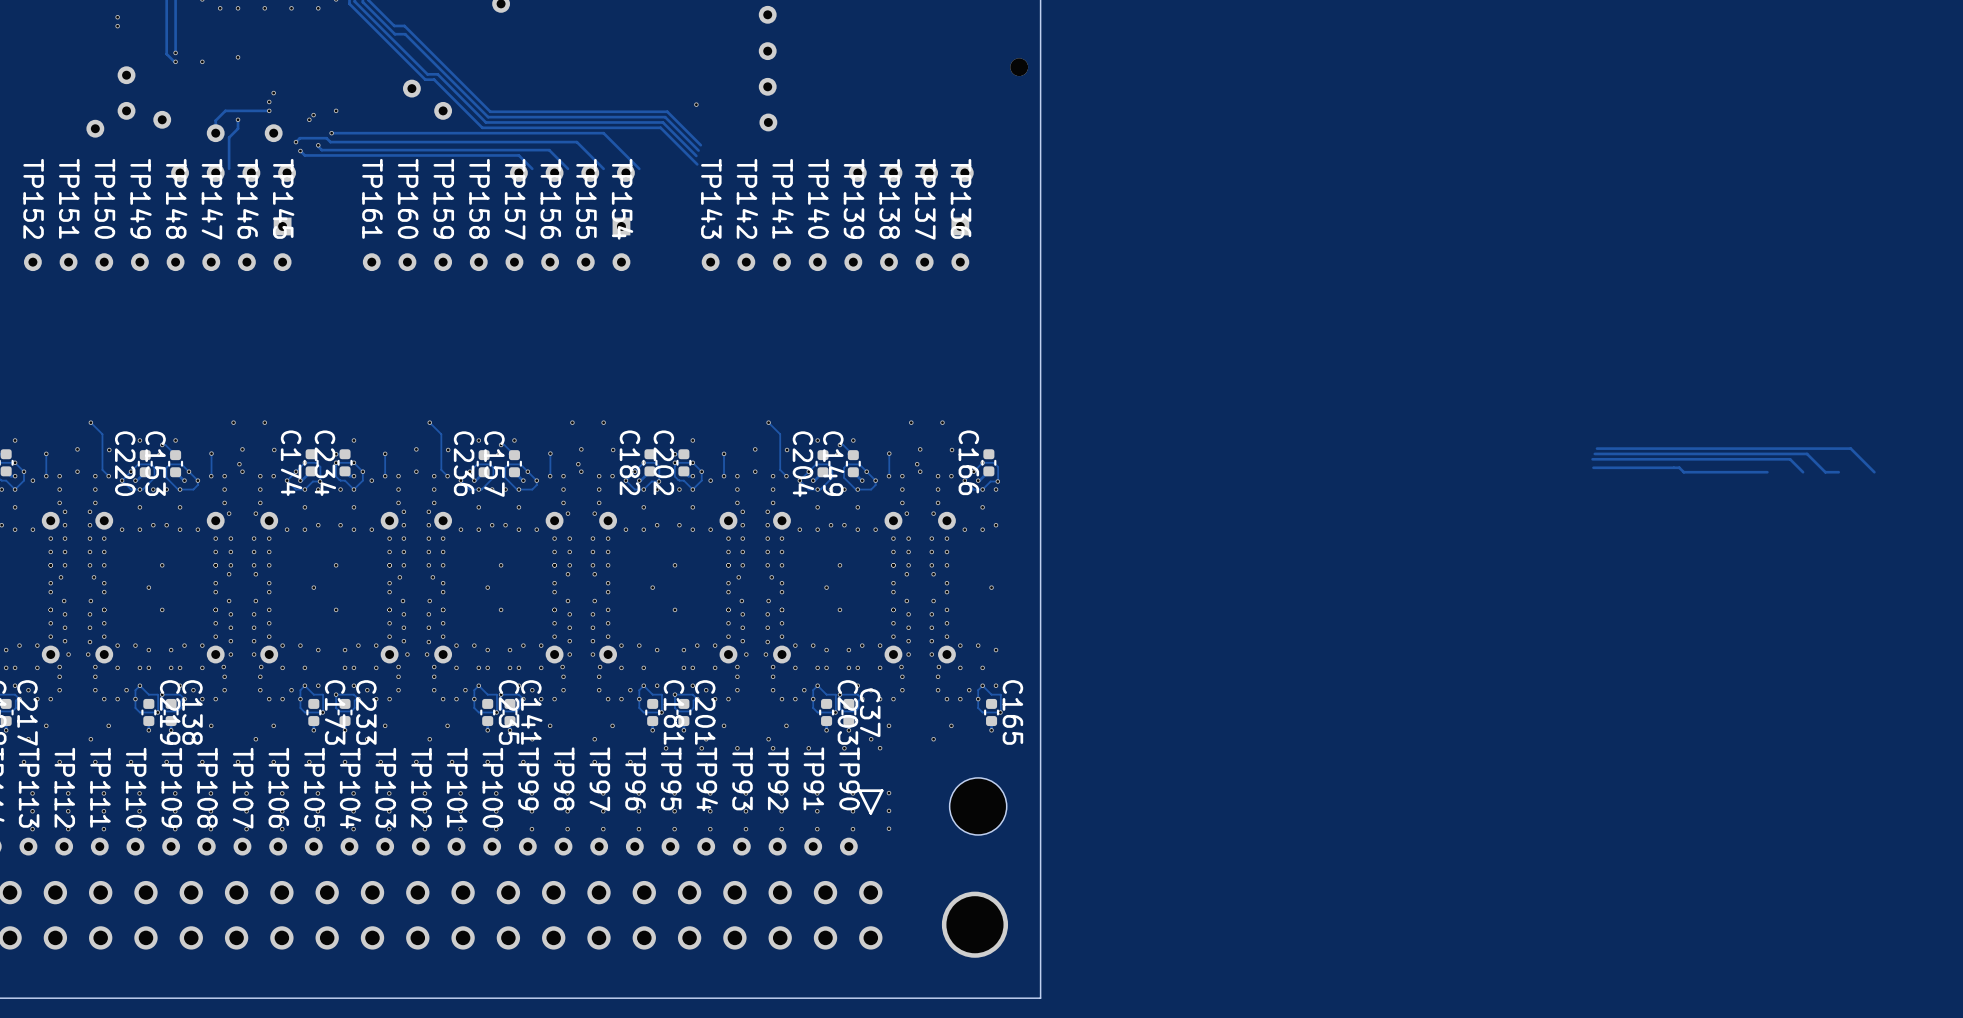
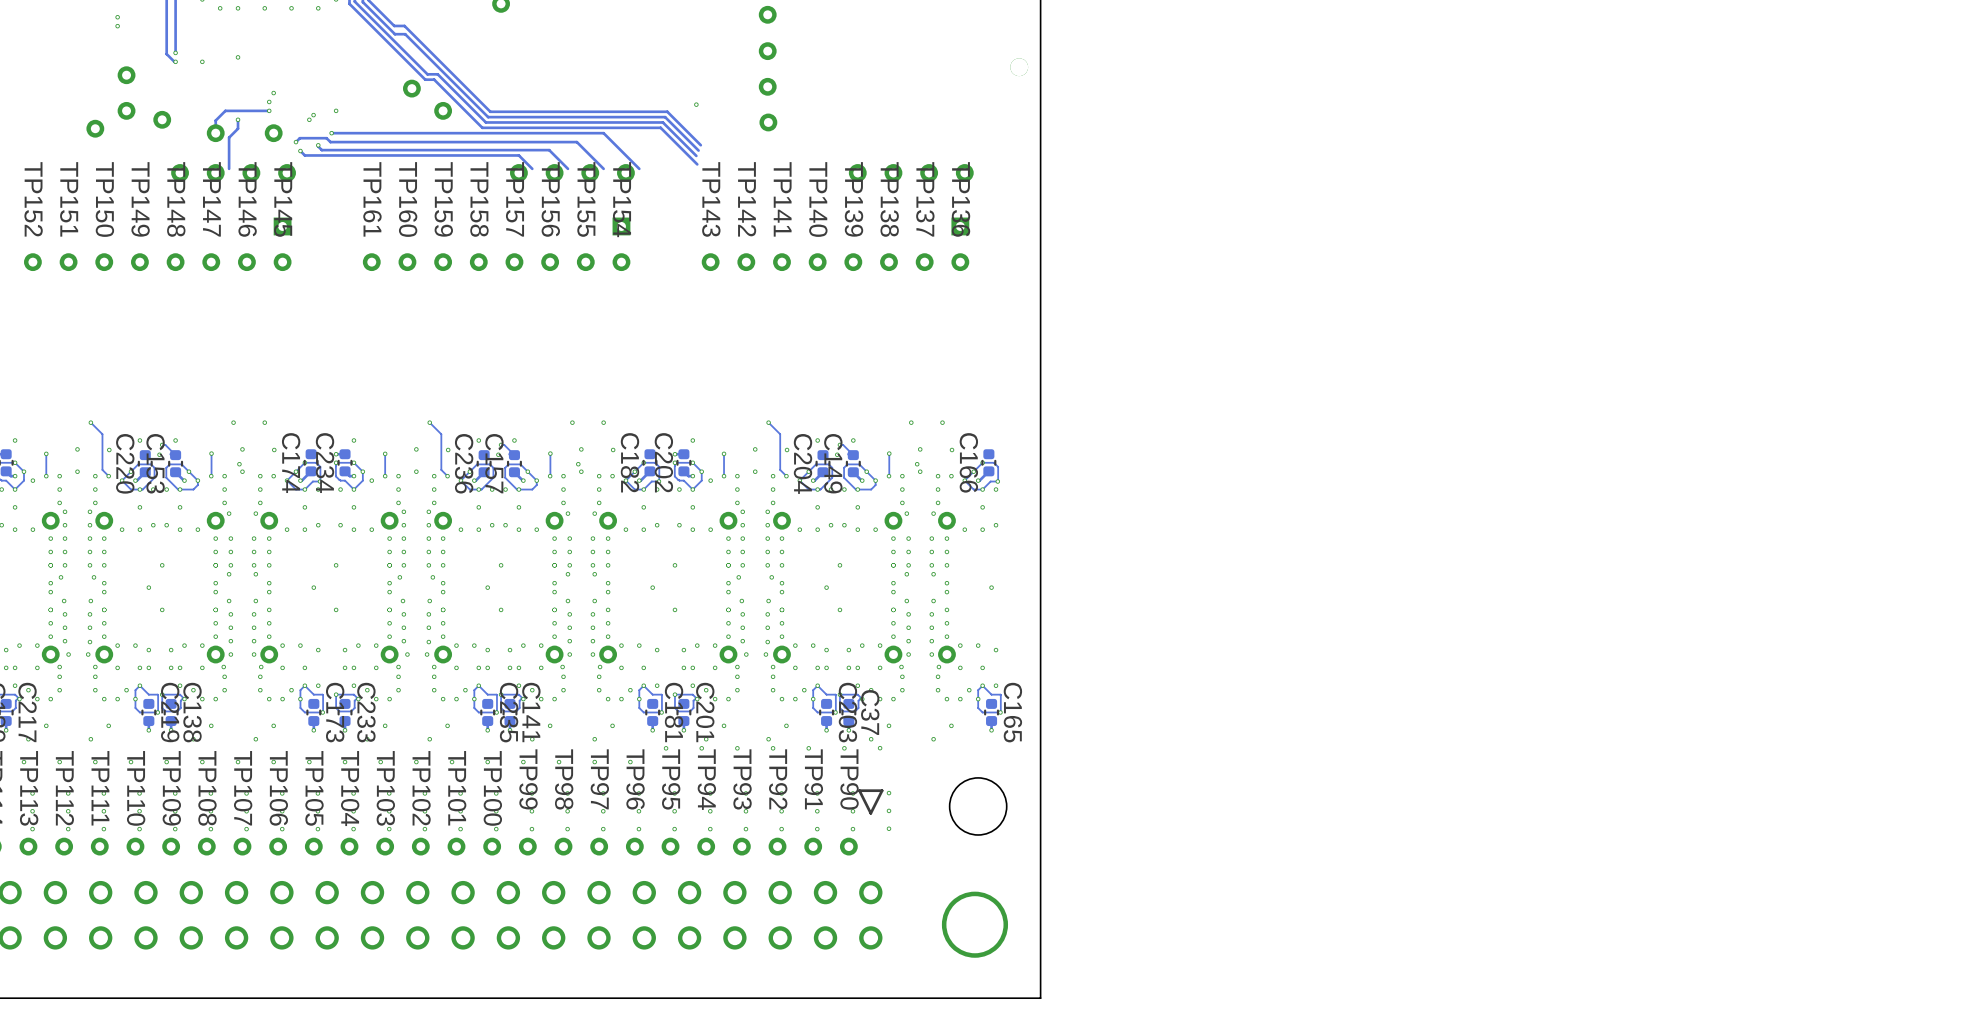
track: (1597, 448) (1850, 448) (1874, 472) -> none
track: (1594, 453) (1807, 453) (1825, 472) (1838, 472) -> none
track: (1592, 459) (1790, 459) (1803, 472) -> none
track: (1673, 467) (1593, 467) -> none
track: (1674, 467) (1679, 467) (1683, 472) (1767, 472) -> none

